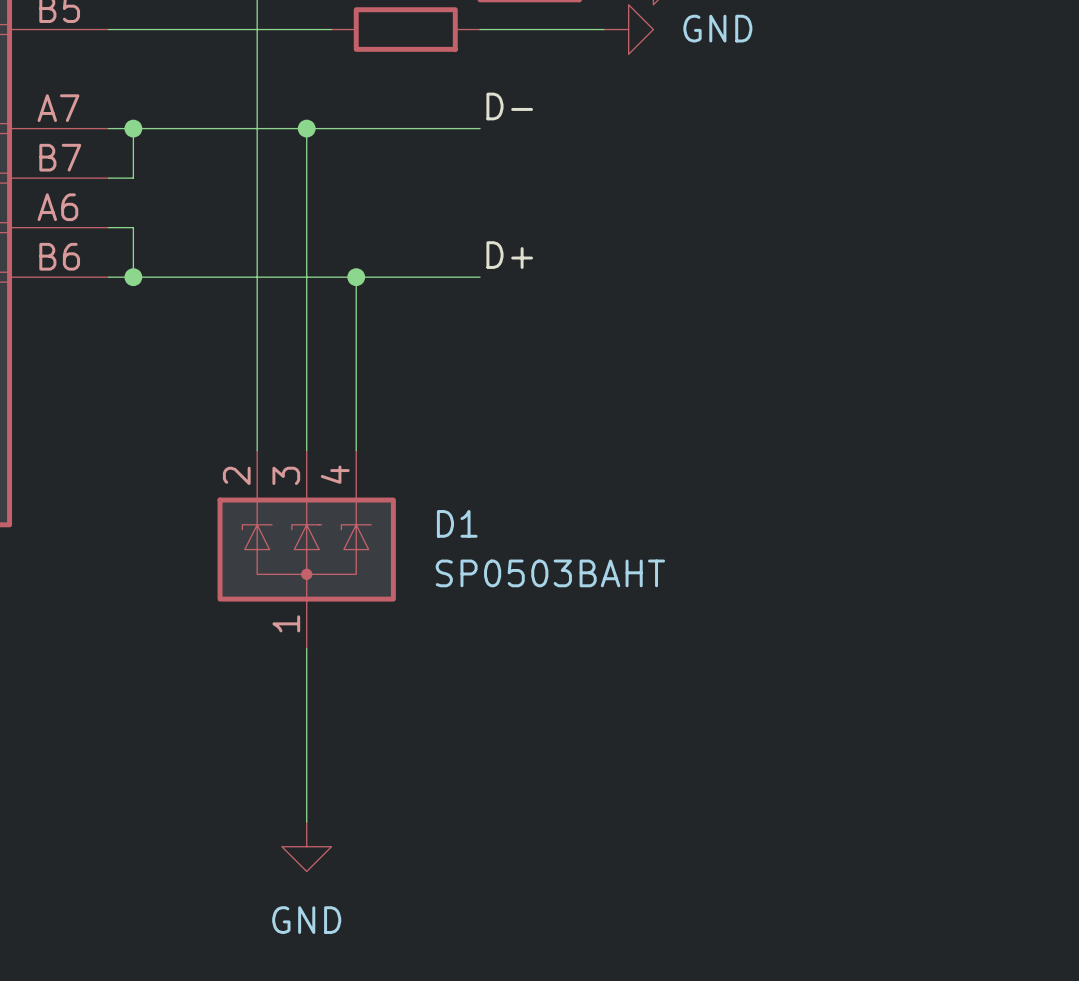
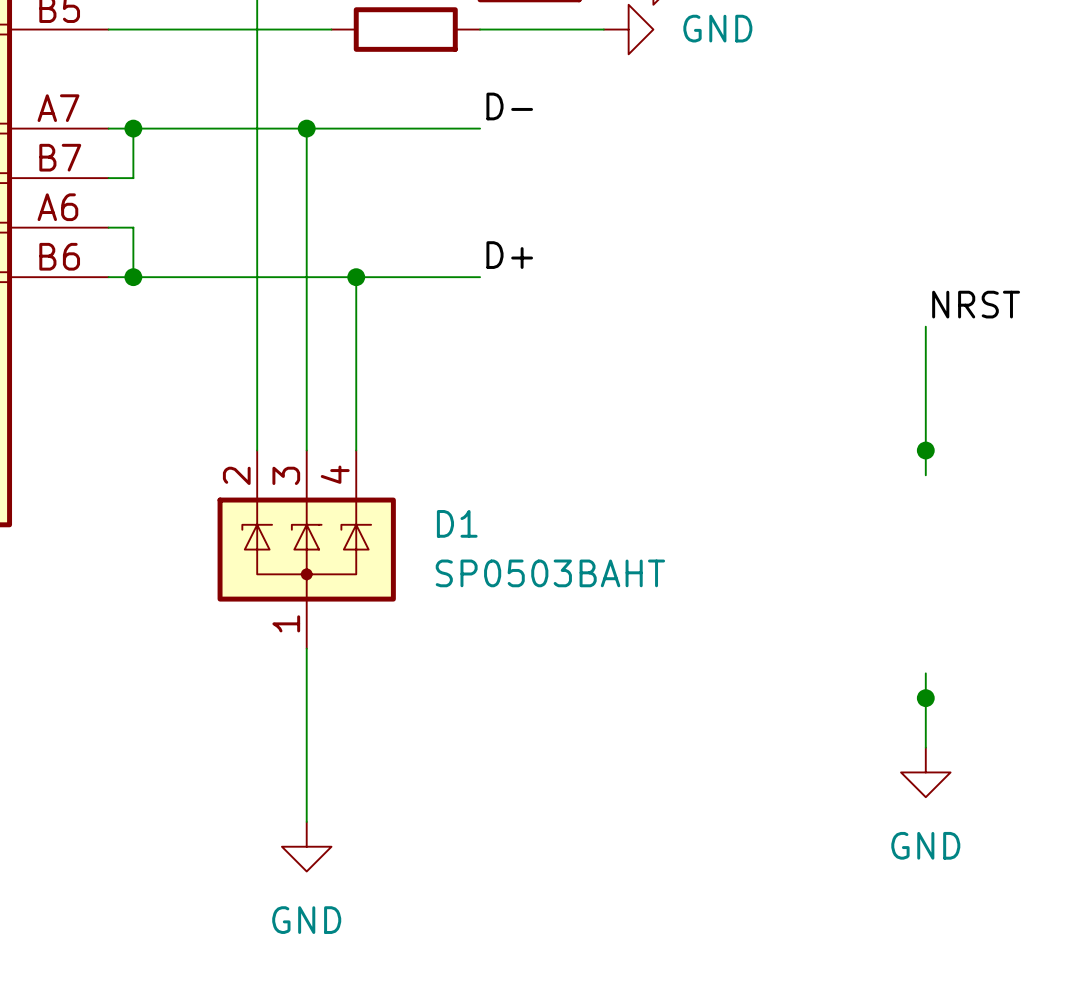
label: none -> NRST (976, 304)
wire: none -> (925, 326) (925, 475)
junction: none -> (925, 450)
wire: none -> (925, 673) (925, 747)
junction: none -> (925, 698)
power symbol: none -> GND (925, 772)

